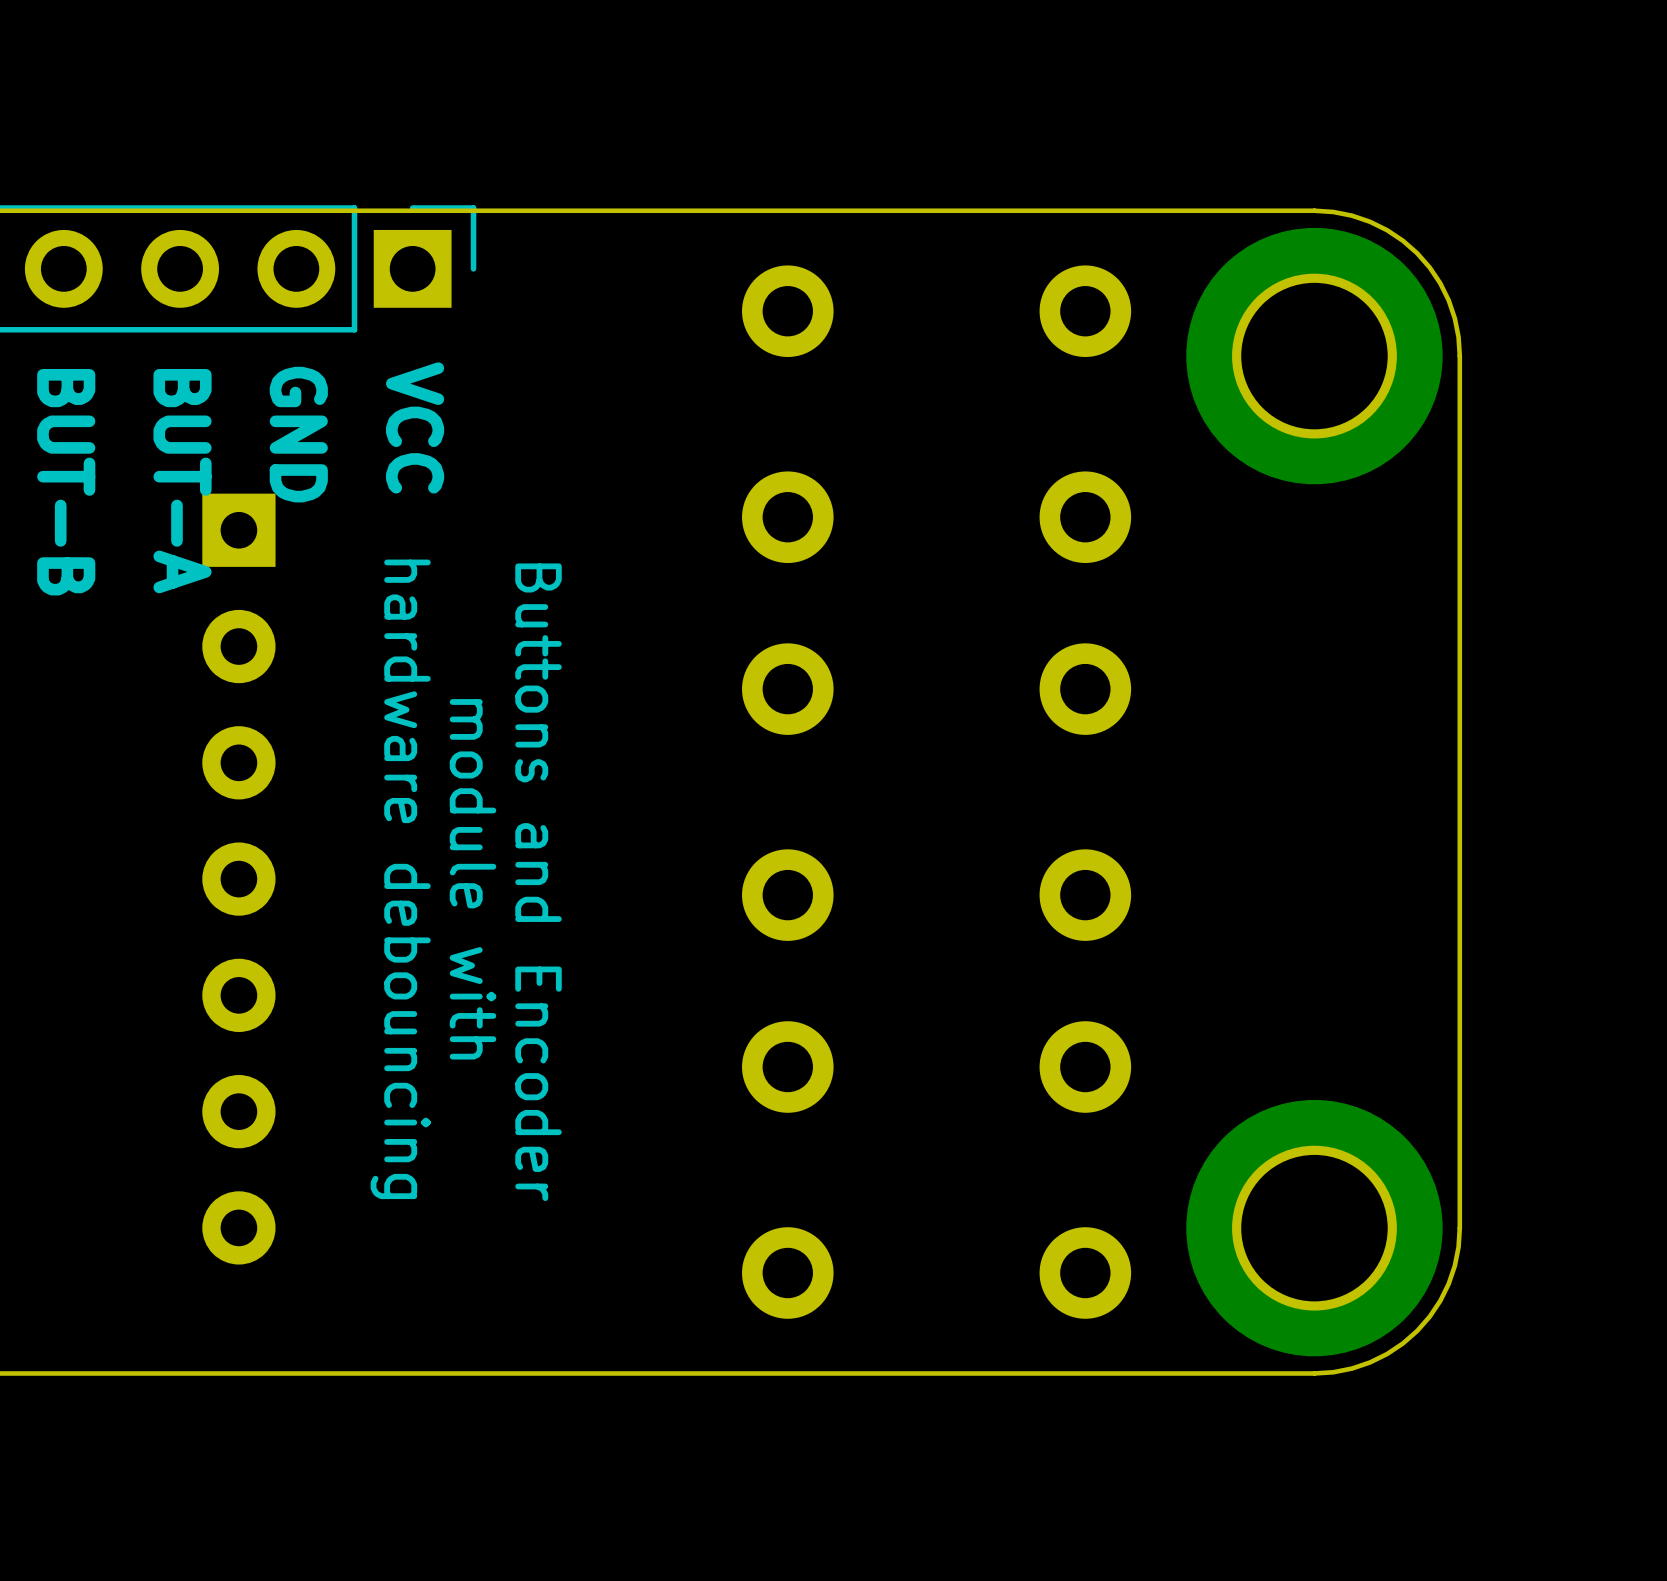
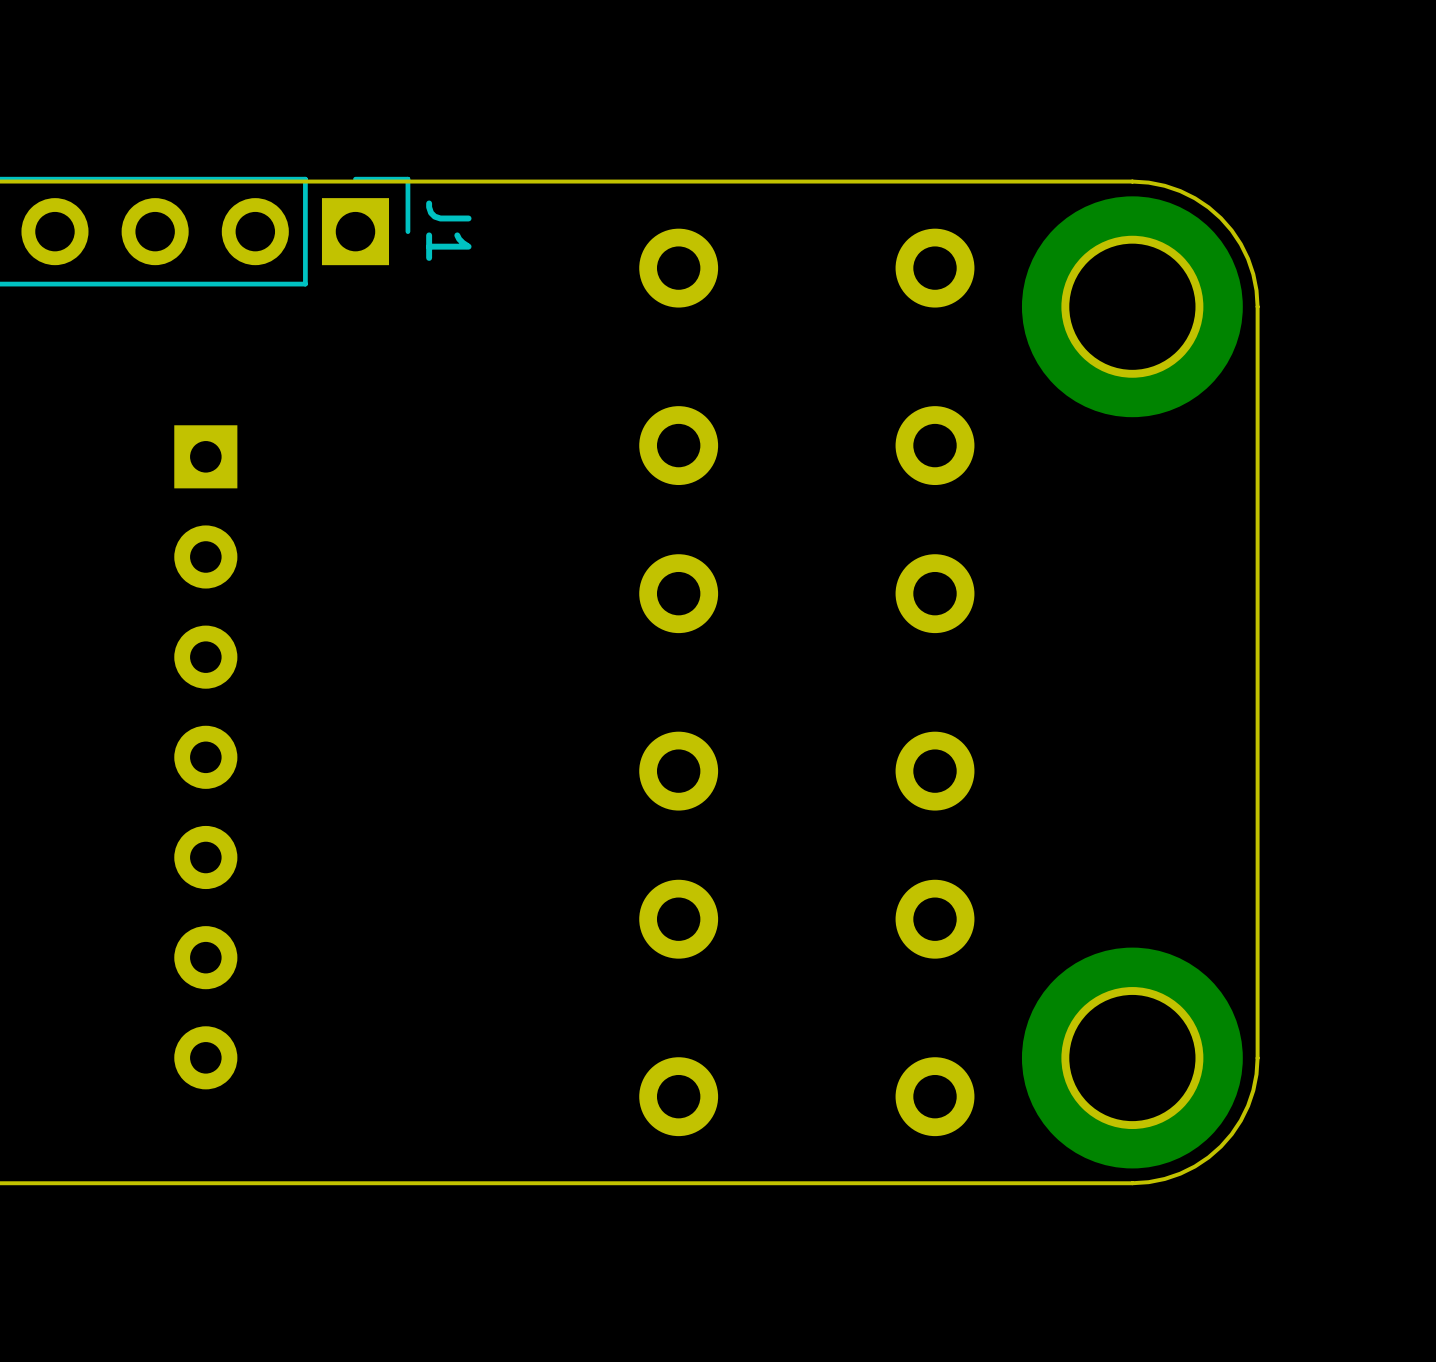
J1 name: none -> J1 (448, 230)
text: VCC (415, 427) -> none
text: GND (298, 434) -> none
text: BUT-A (182, 481) -> none
text: BUT-B (66, 482) -> none
text: hardware debouncing (400, 879) -> none
text: module with (472, 879) -> none
text: Buttons and Encoder (538, 882) -> none

